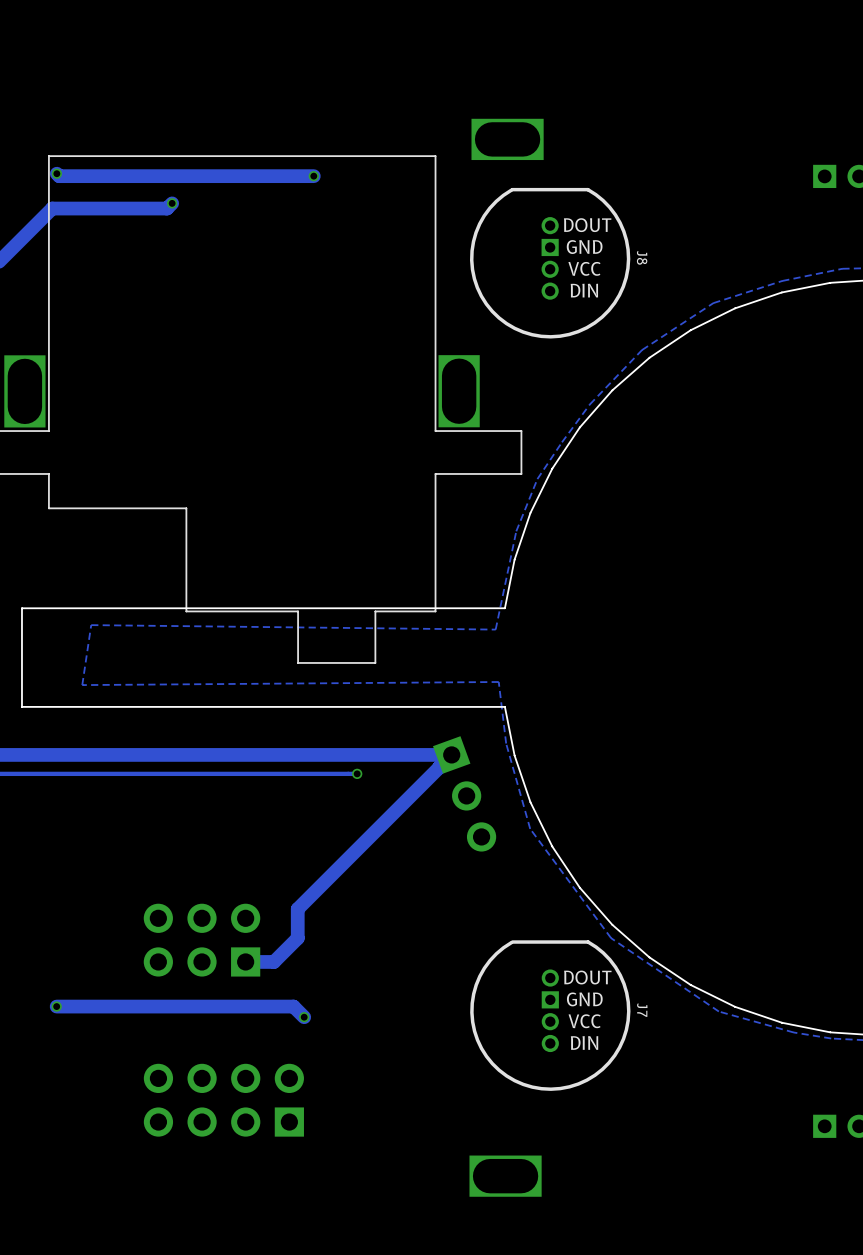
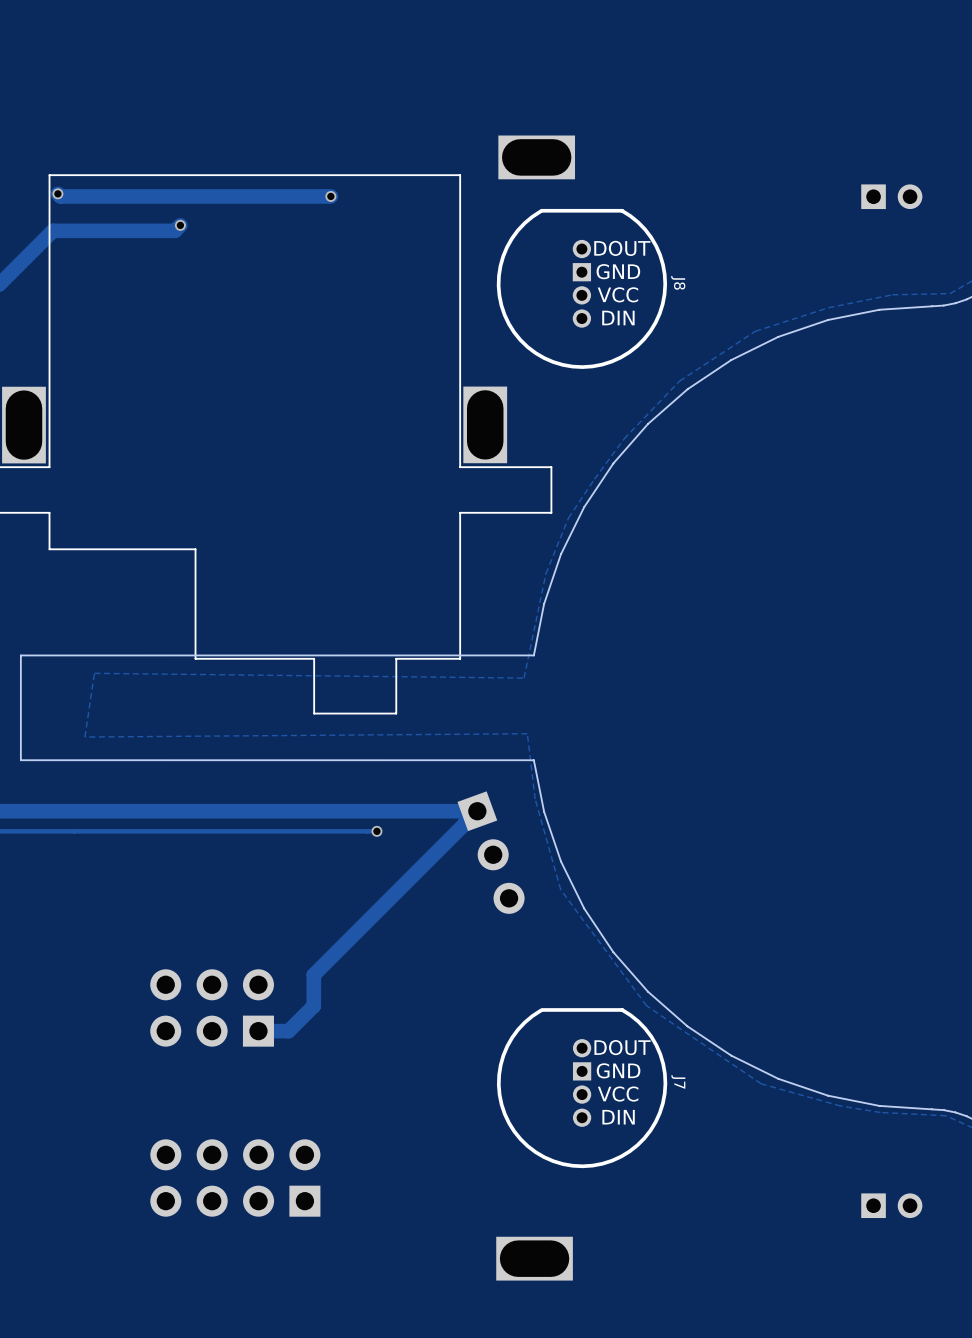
track: (56, 1006) (293, 1006) (304, 1017) -> none
via: (56, 1006) -> none
via: (304, 1017) -> none

